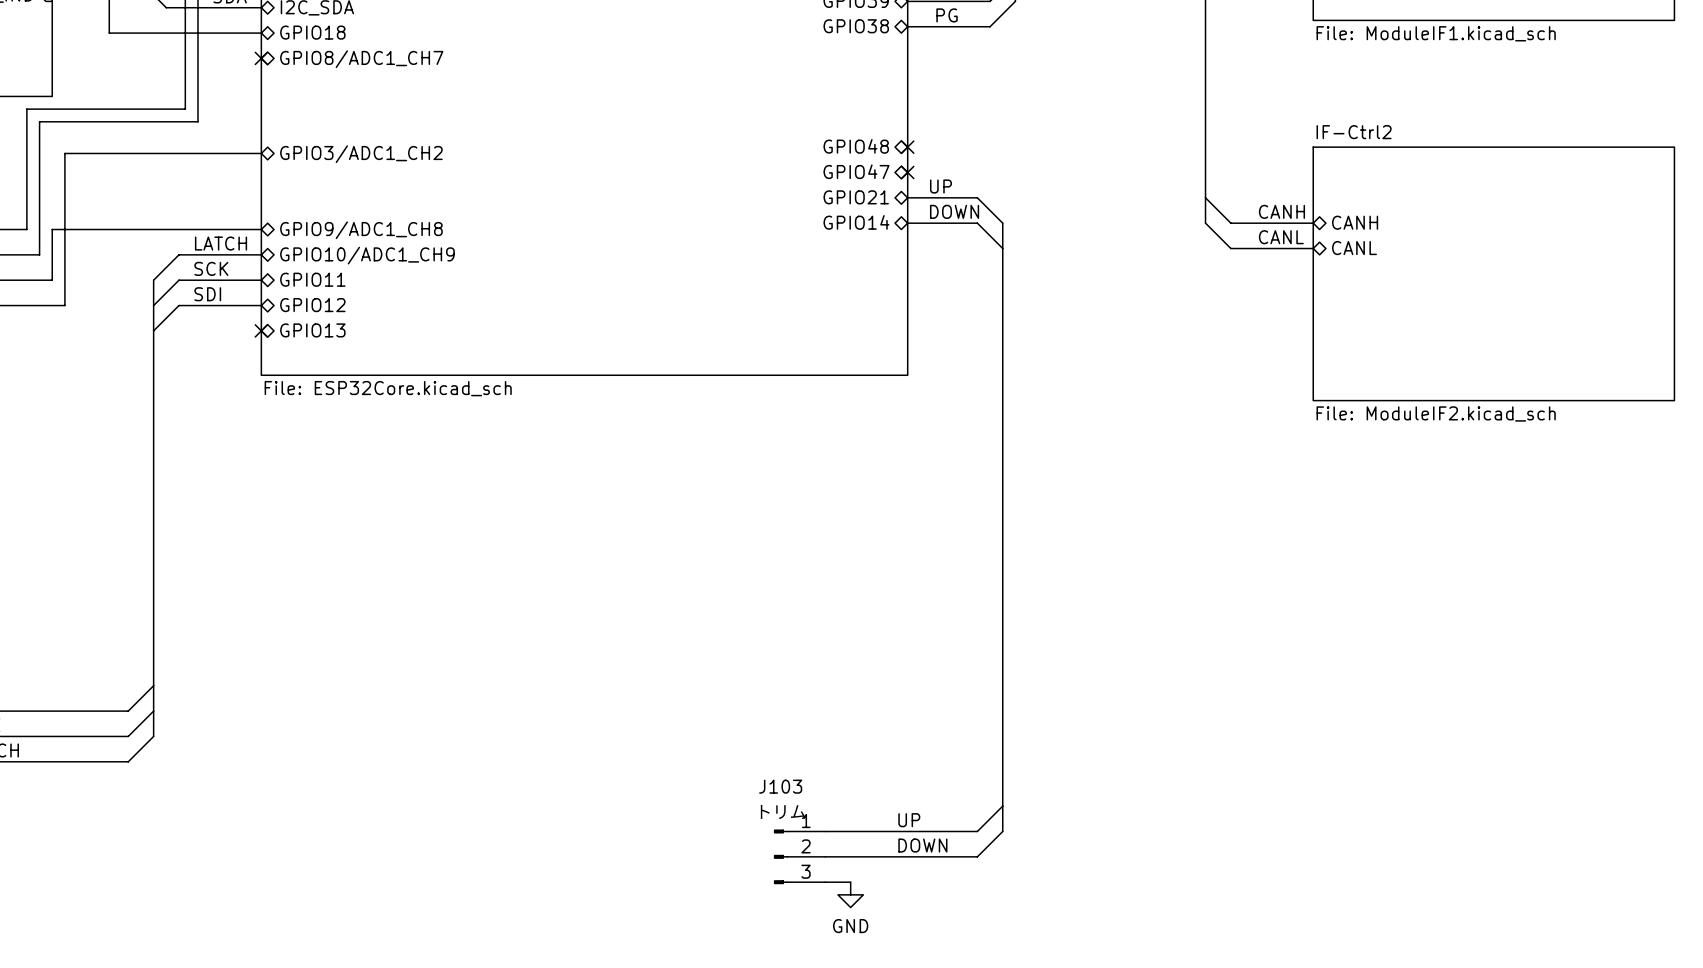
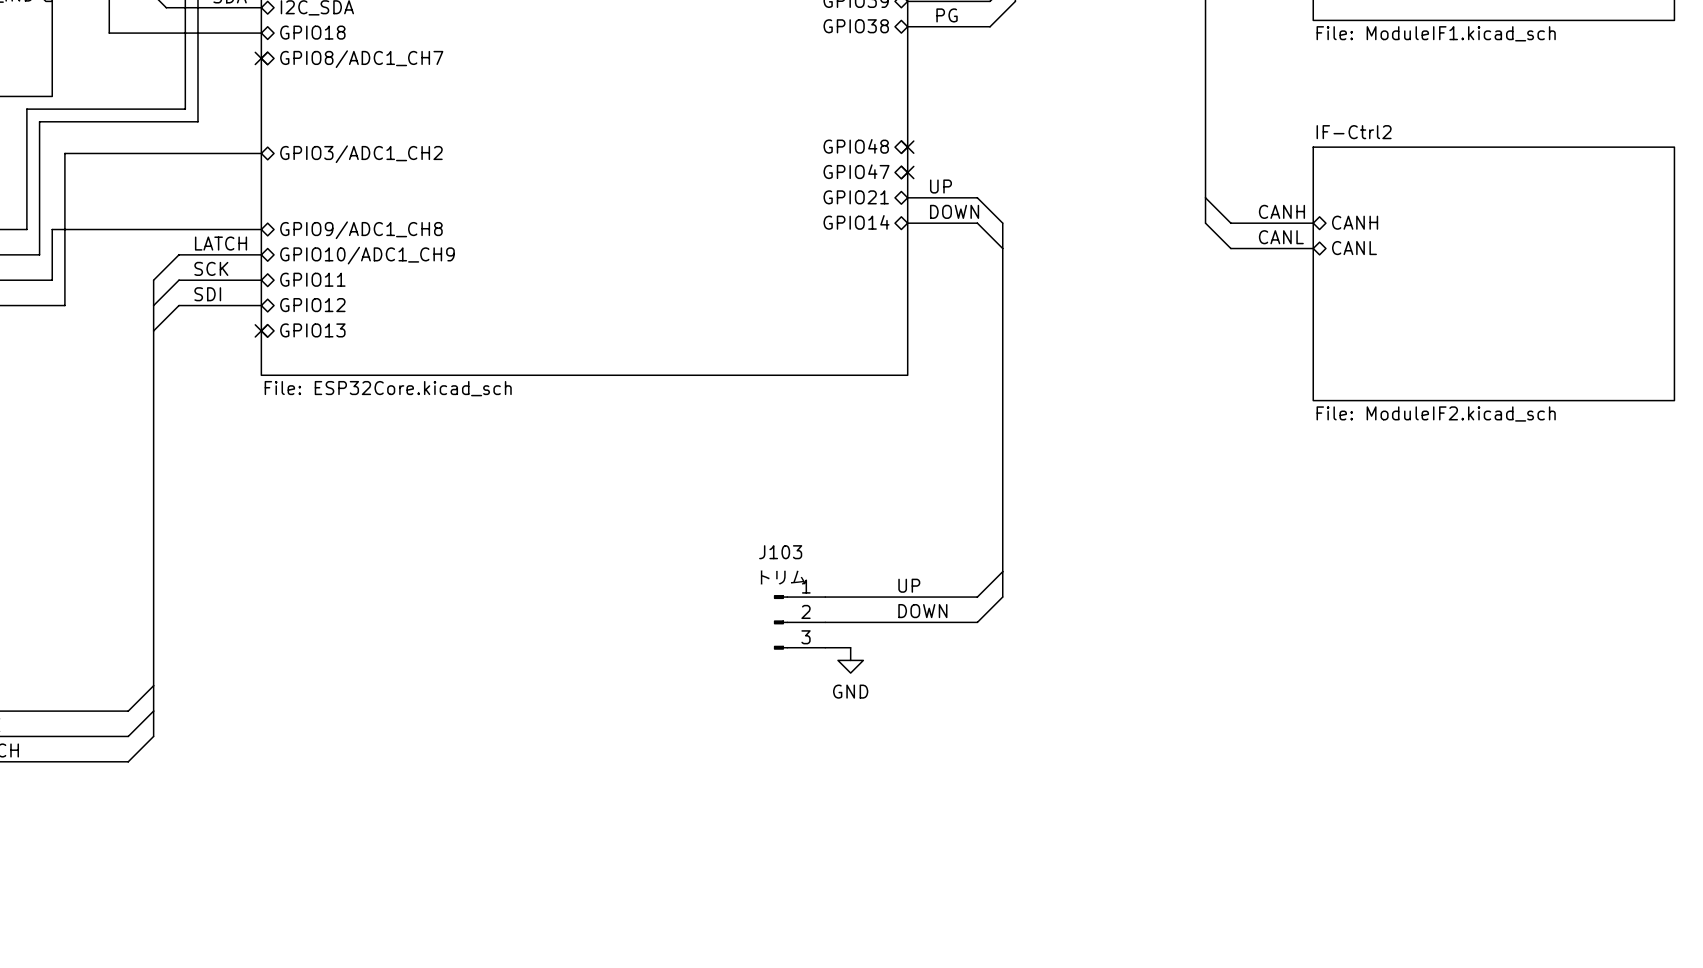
bus: (1002, 597) (1002, 831) -> none
wire: (1002, 806) (977, 831) (825, 831) -> (1002, 571) (977, 597) (825, 597)
label position: UP (909, 820) -> UP (909, 585)
wire: (1002, 831) (977, 856) (825, 856) -> (1002, 597) (977, 622) (825, 622)
label position: DOWN (922, 845) -> DOWN (922, 611)
J103 position: (799, 856) -> (799, 622)
wire: (825, 882) (850, 882) -> (825, 647) (850, 647)
power symbol position: GND (850, 894) -> GND (850, 660)

